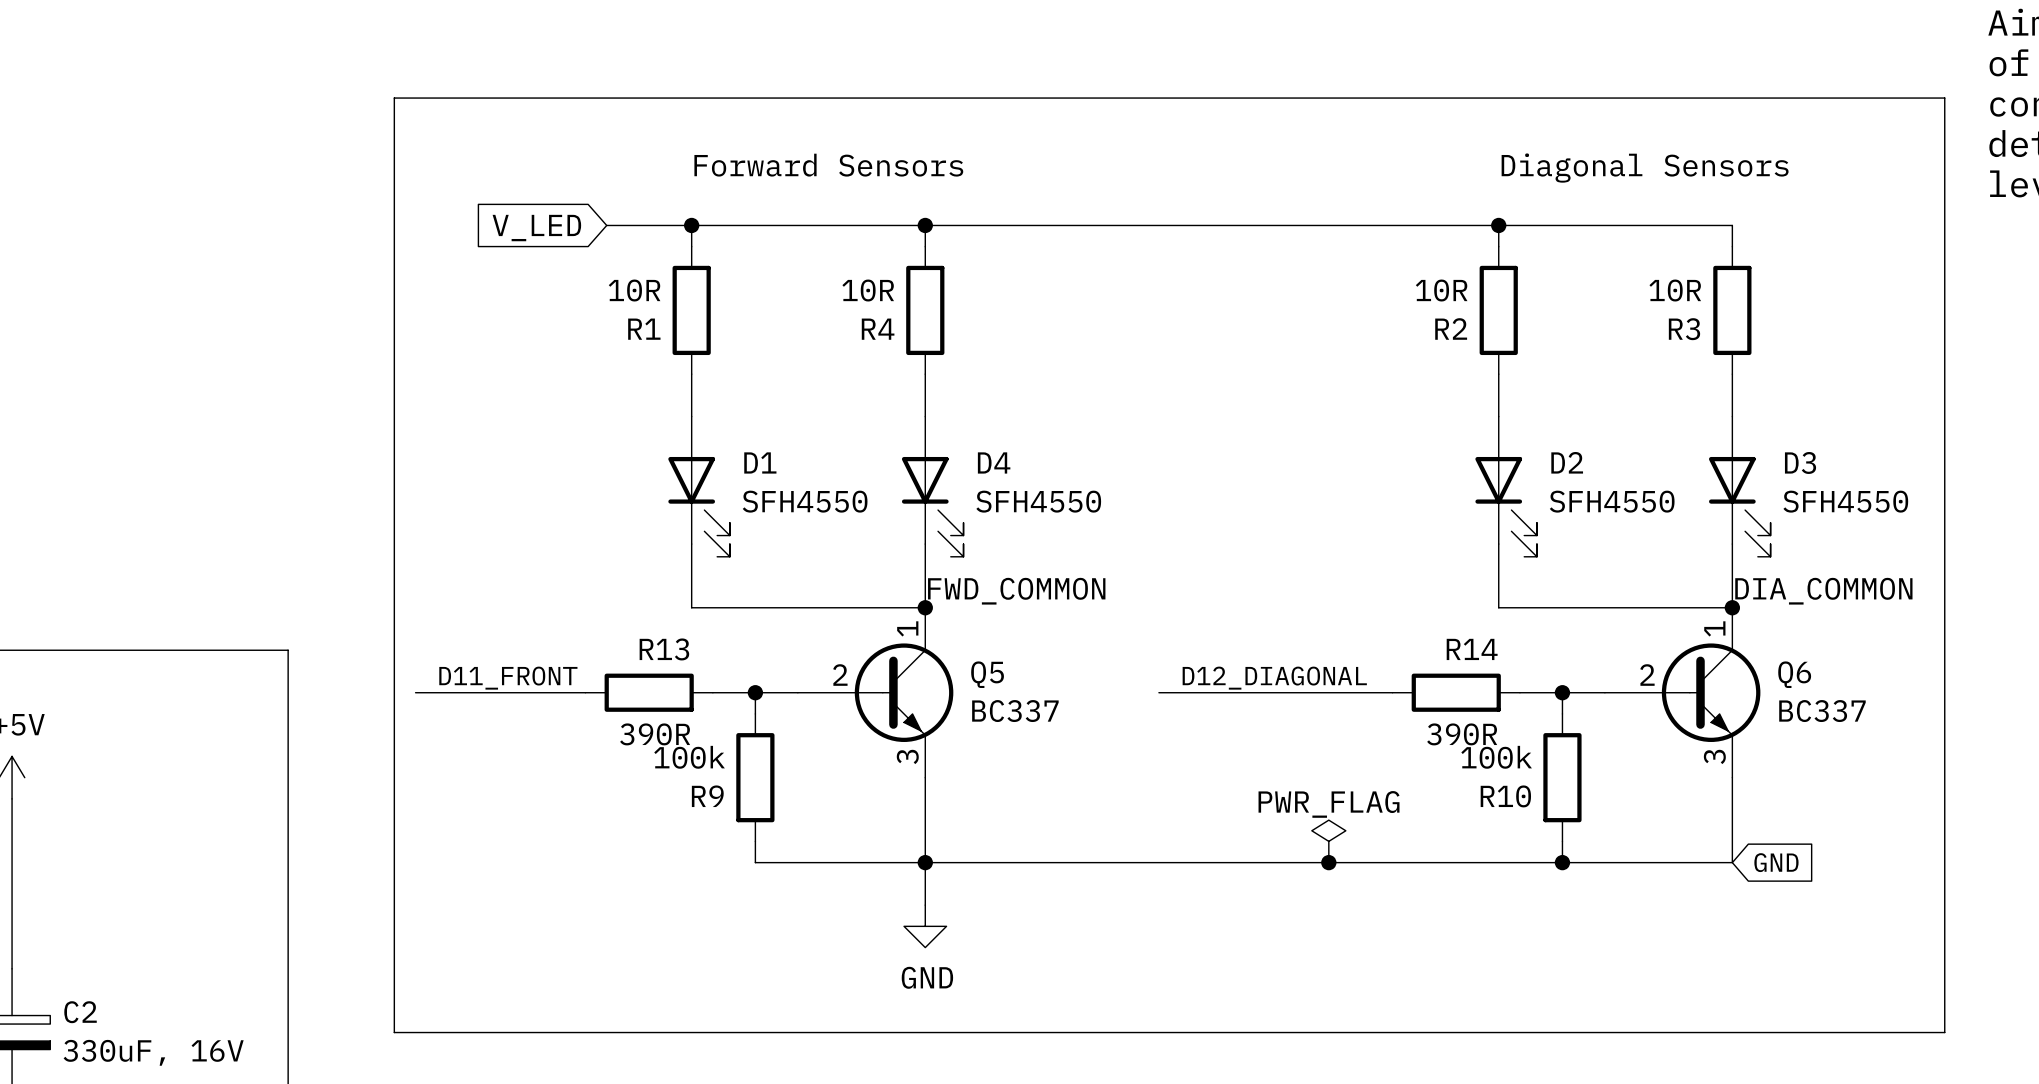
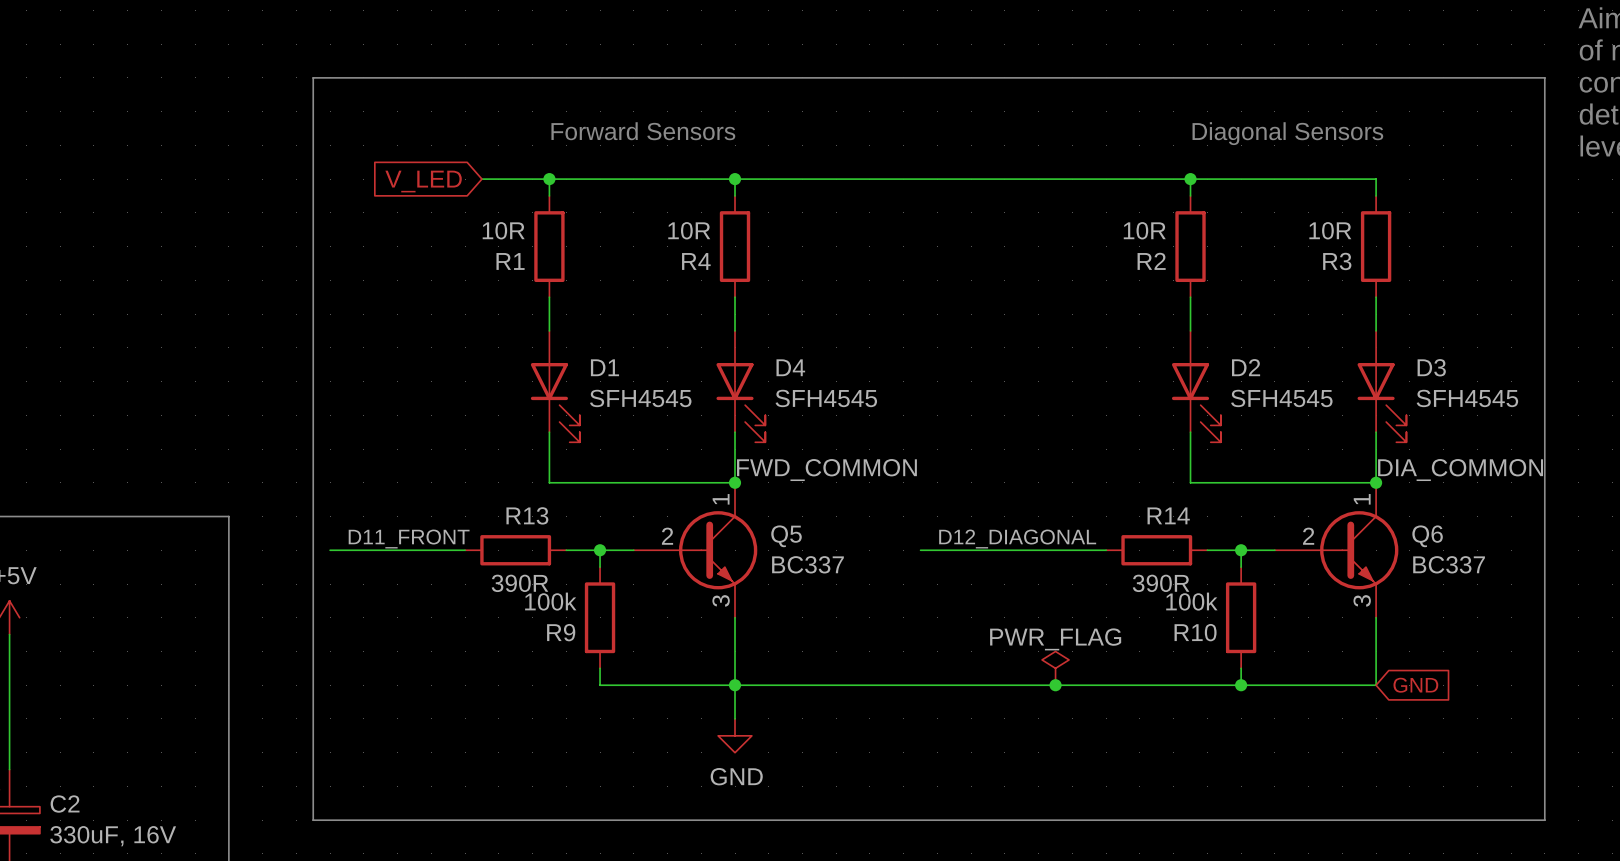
D1 value: SFH4550 (805, 501) -> SFH4545 (640, 398)
D4 value: SFH4550 (1038, 501) -> SFH4545 (826, 398)
D2 value: SFH4550 (1612, 501) -> SFH4545 (1281, 398)
D3 value: SFH4550 (1845, 501) -> SFH4545 (1467, 398)

